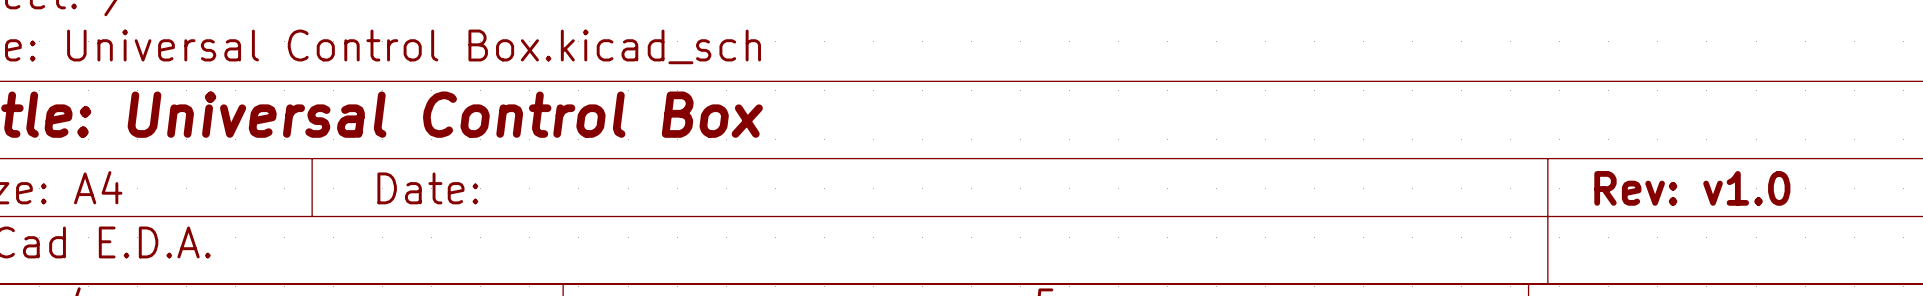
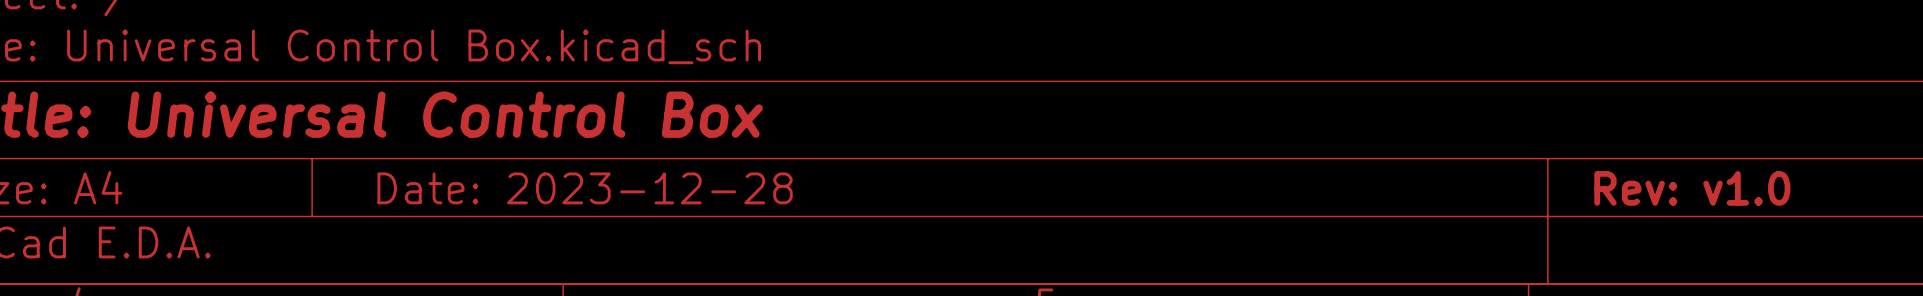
title block: Date: (427, 188) -> Date: 2023-12-28 (585, 188)

